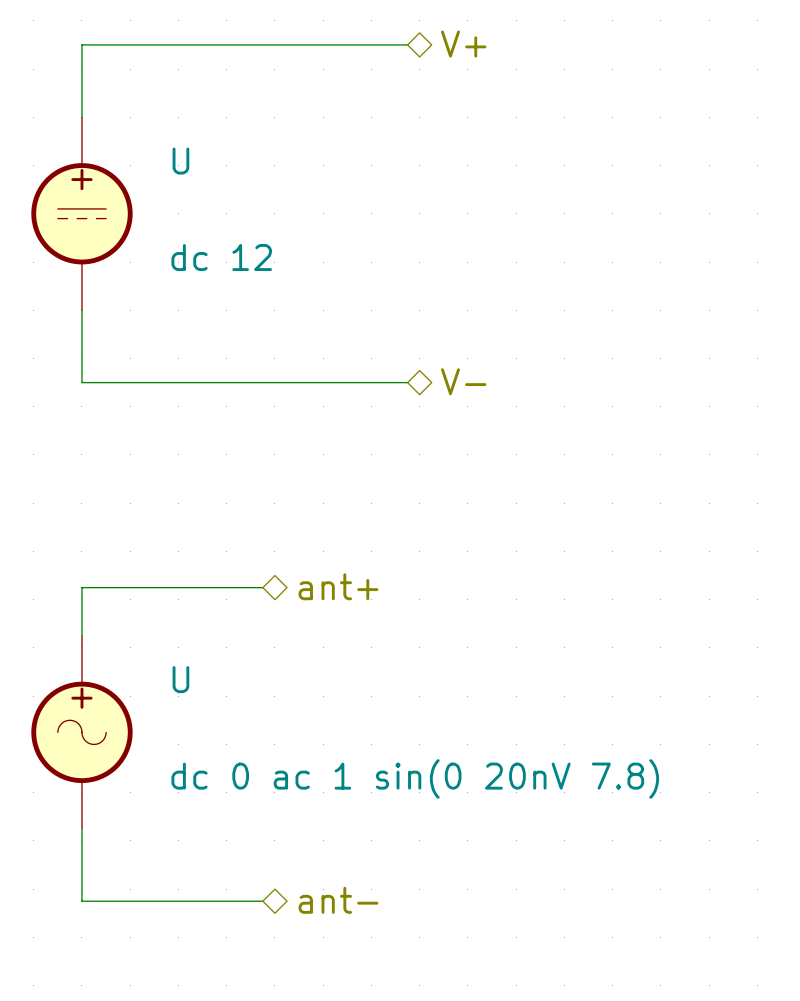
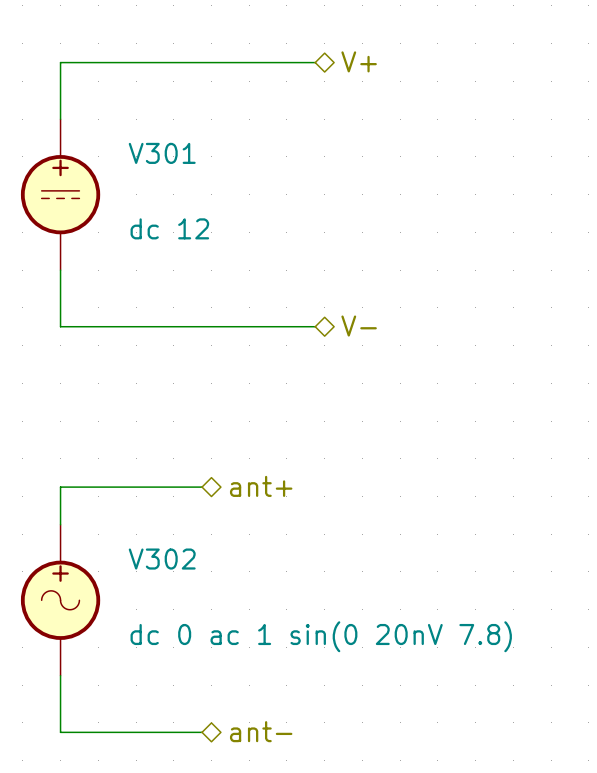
U name: U (180, 161) -> V301 (162, 153)
U name: U (180, 679) -> V302 (162, 559)

